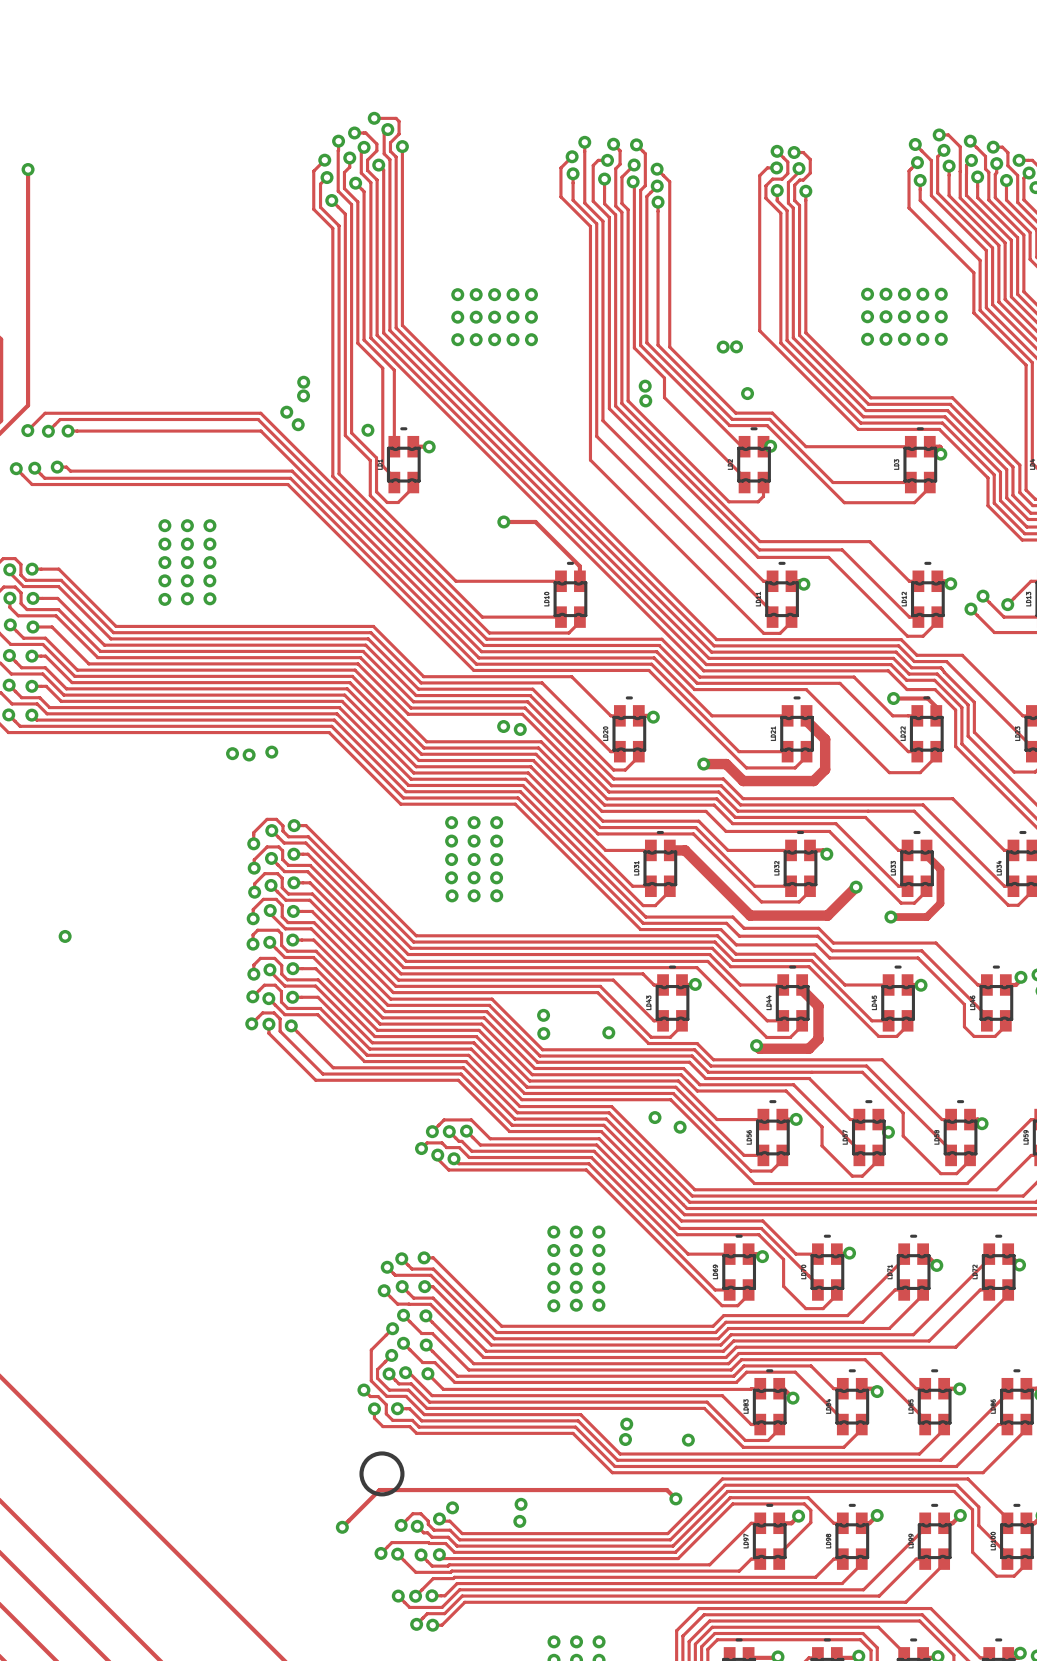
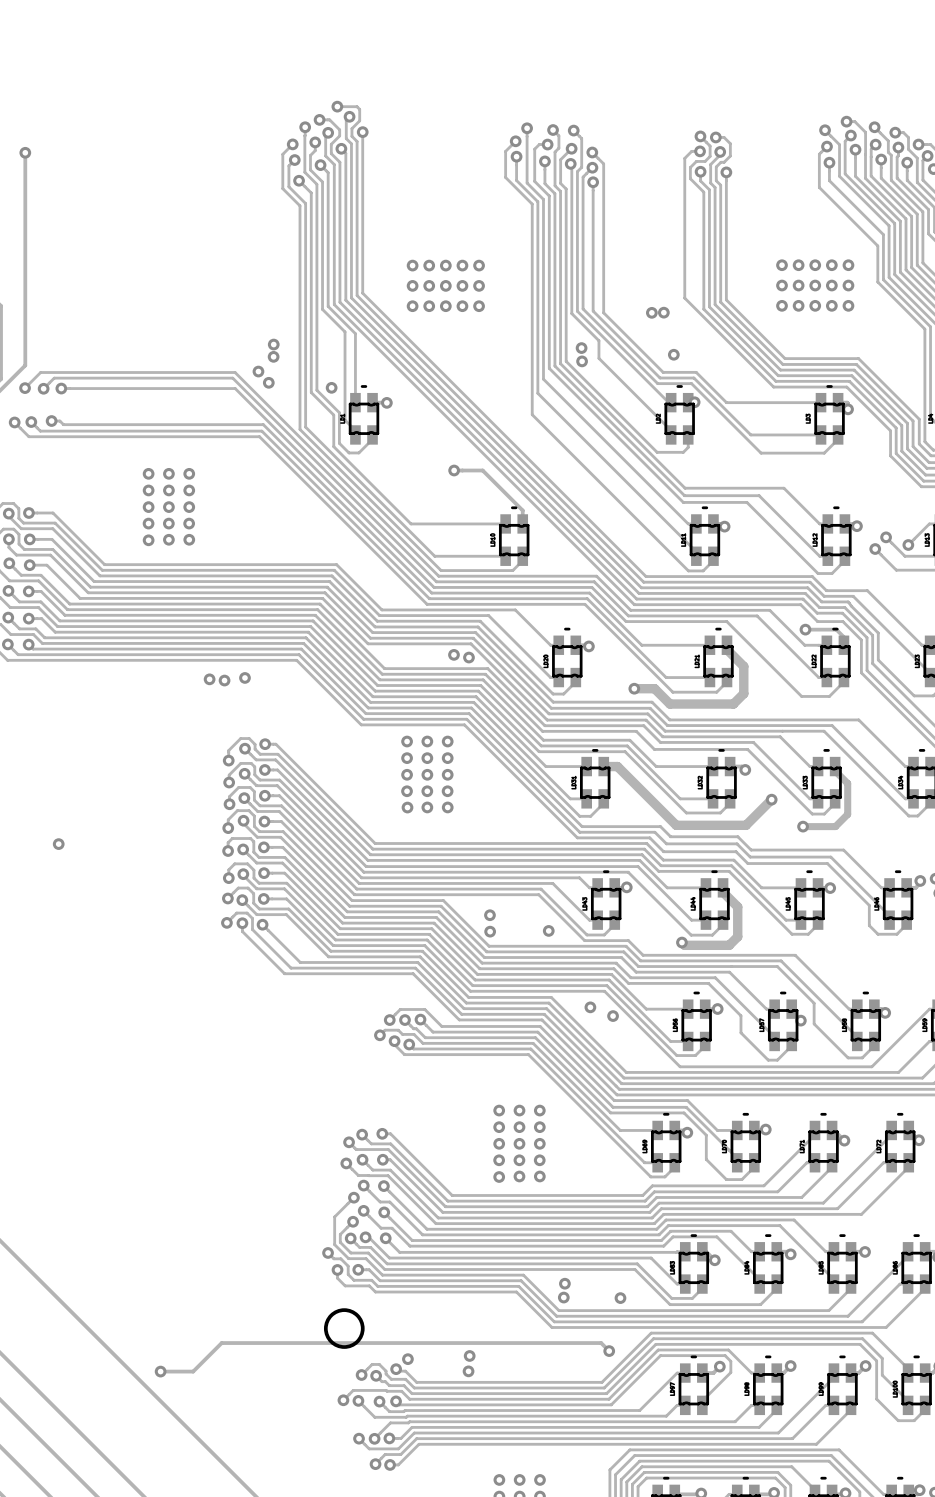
track: (667, 1490) (379, 1490) (342, 1527) -> (601, 1343) (221, 1343) (193, 1371) (160, 1371)
via: none -> (160, 1371)
via: (342, 1527) -> none

